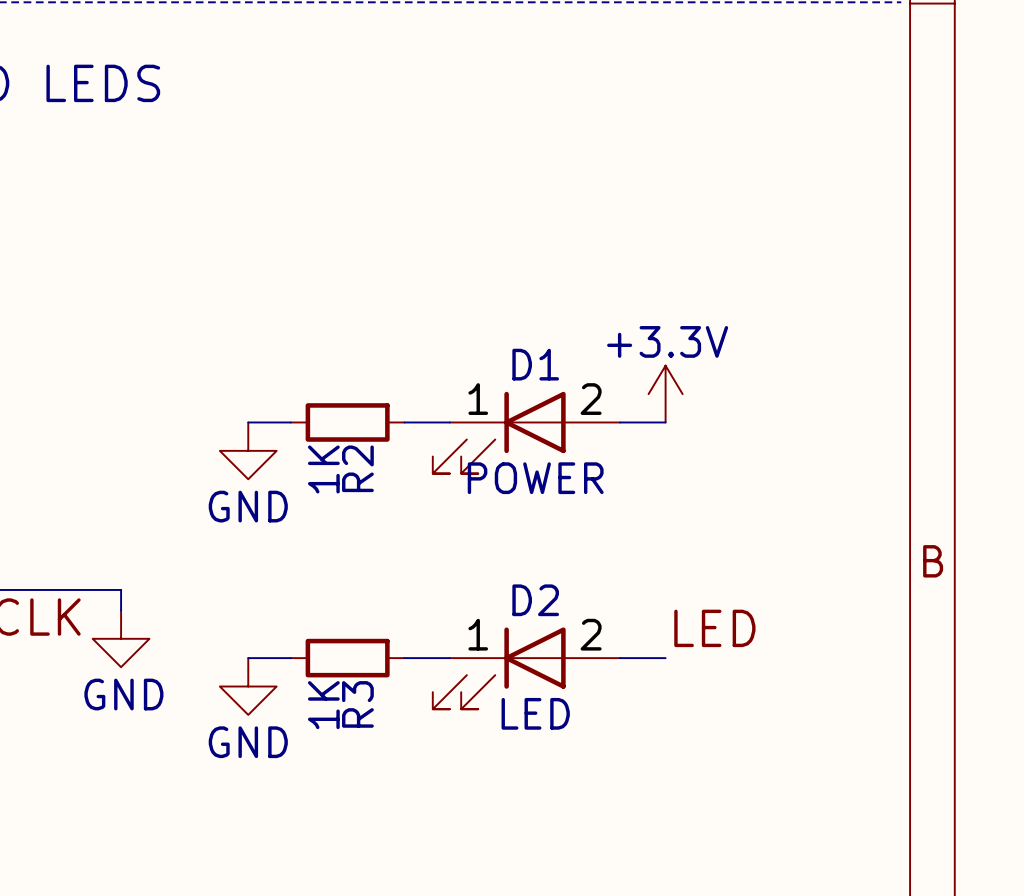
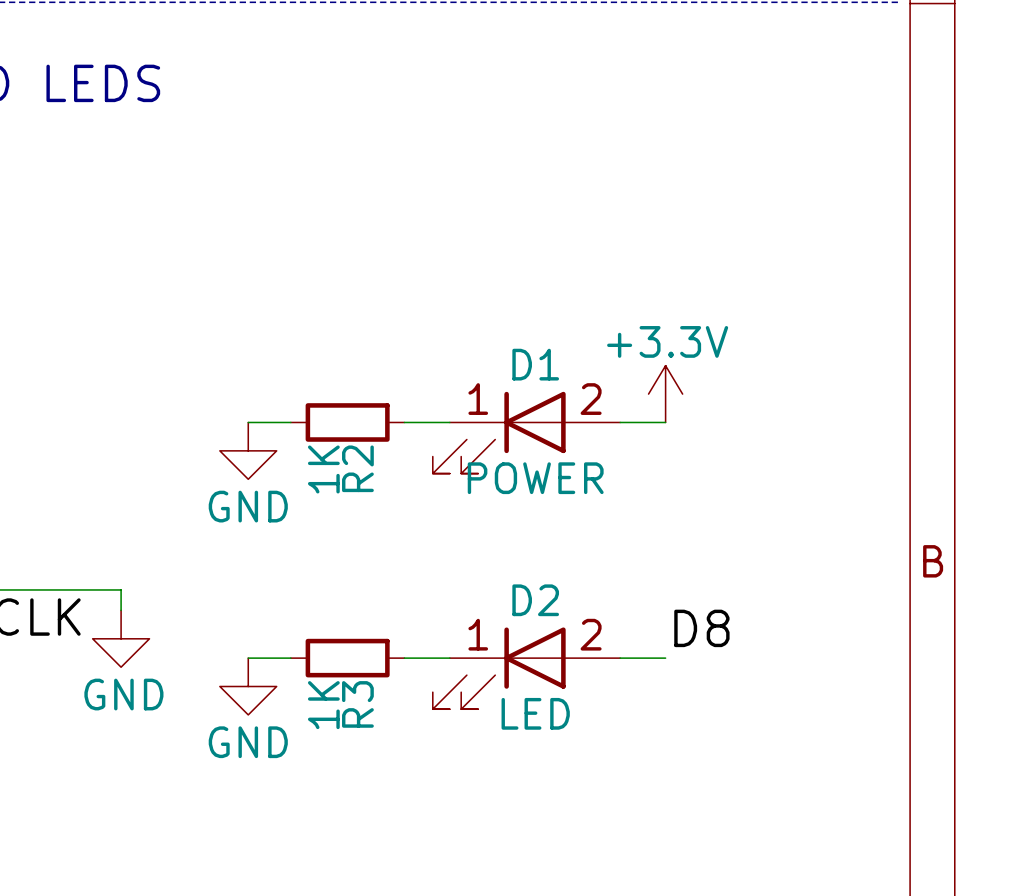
label: LED (714, 628) -> D8 (701, 628)

